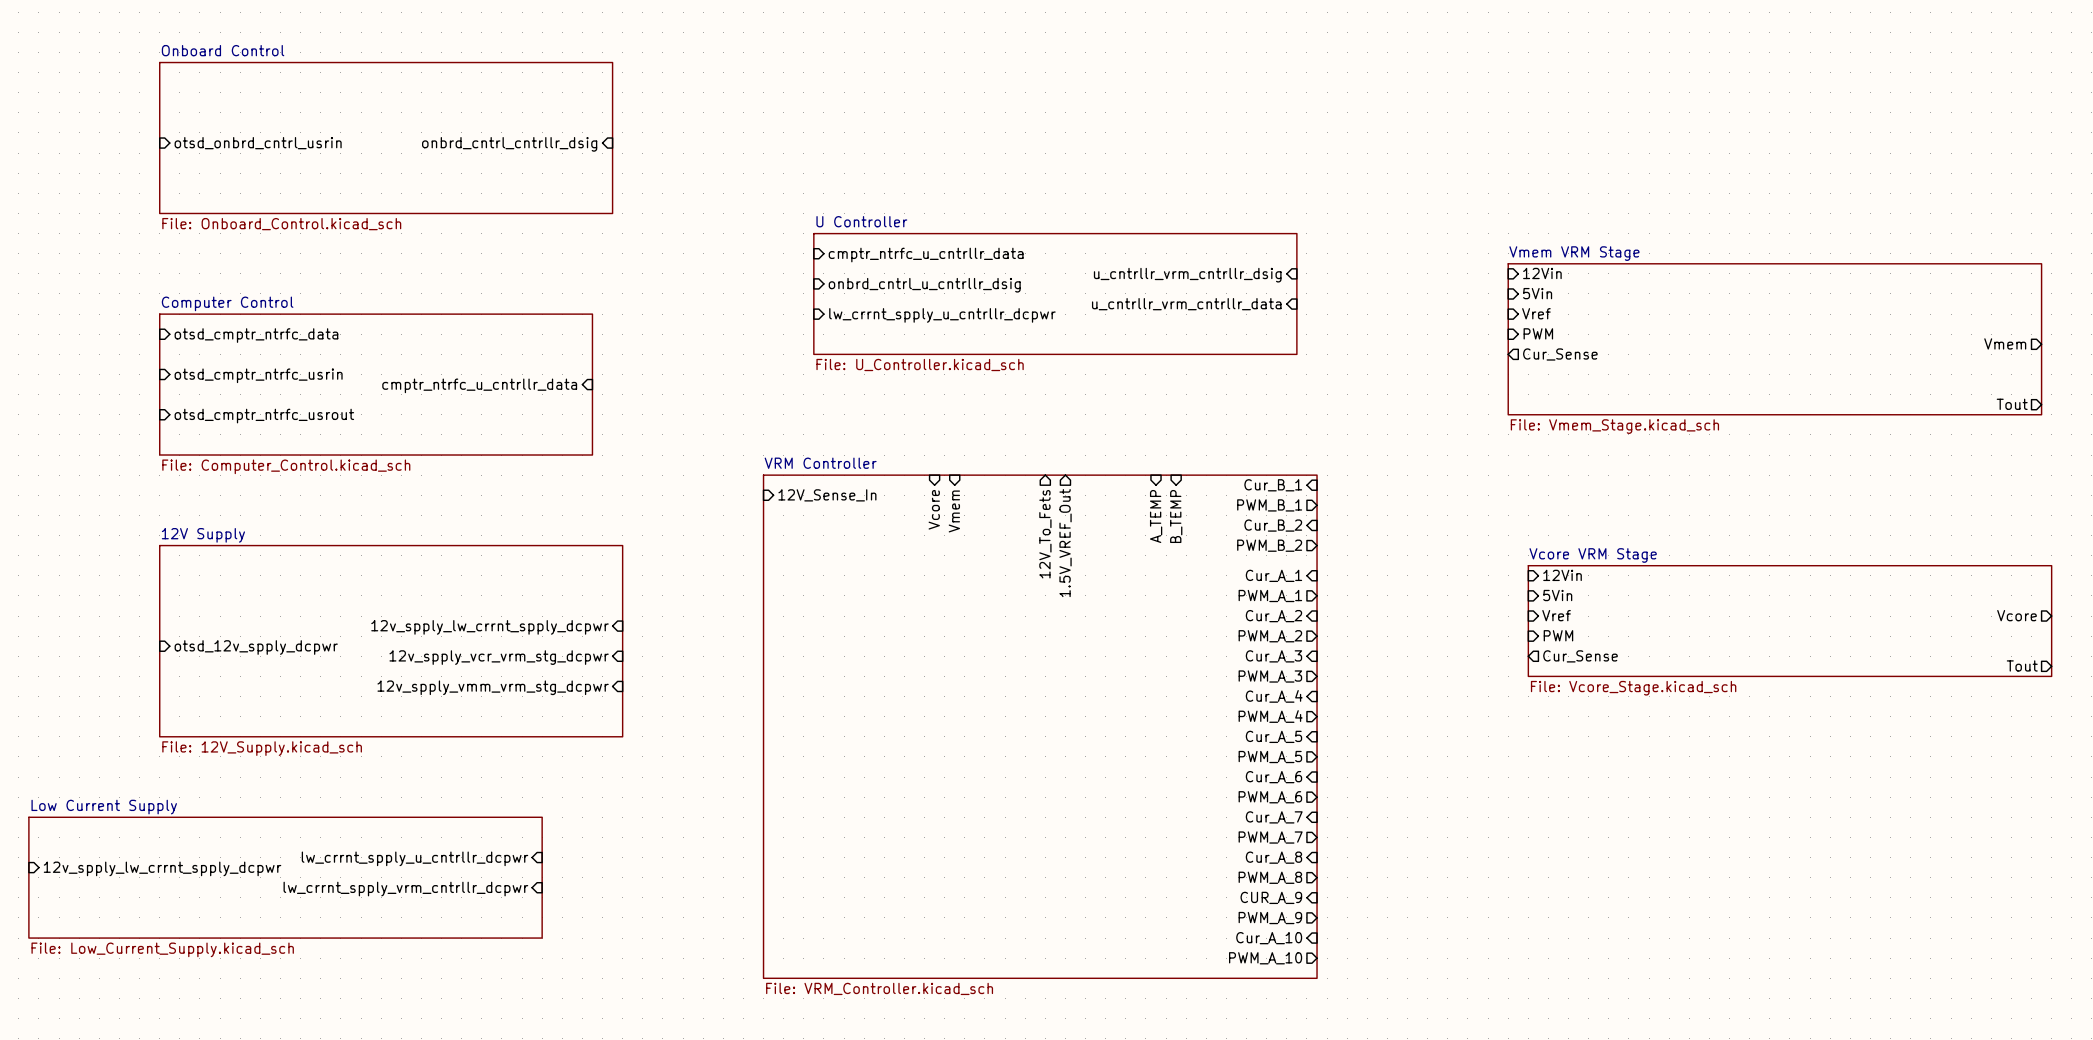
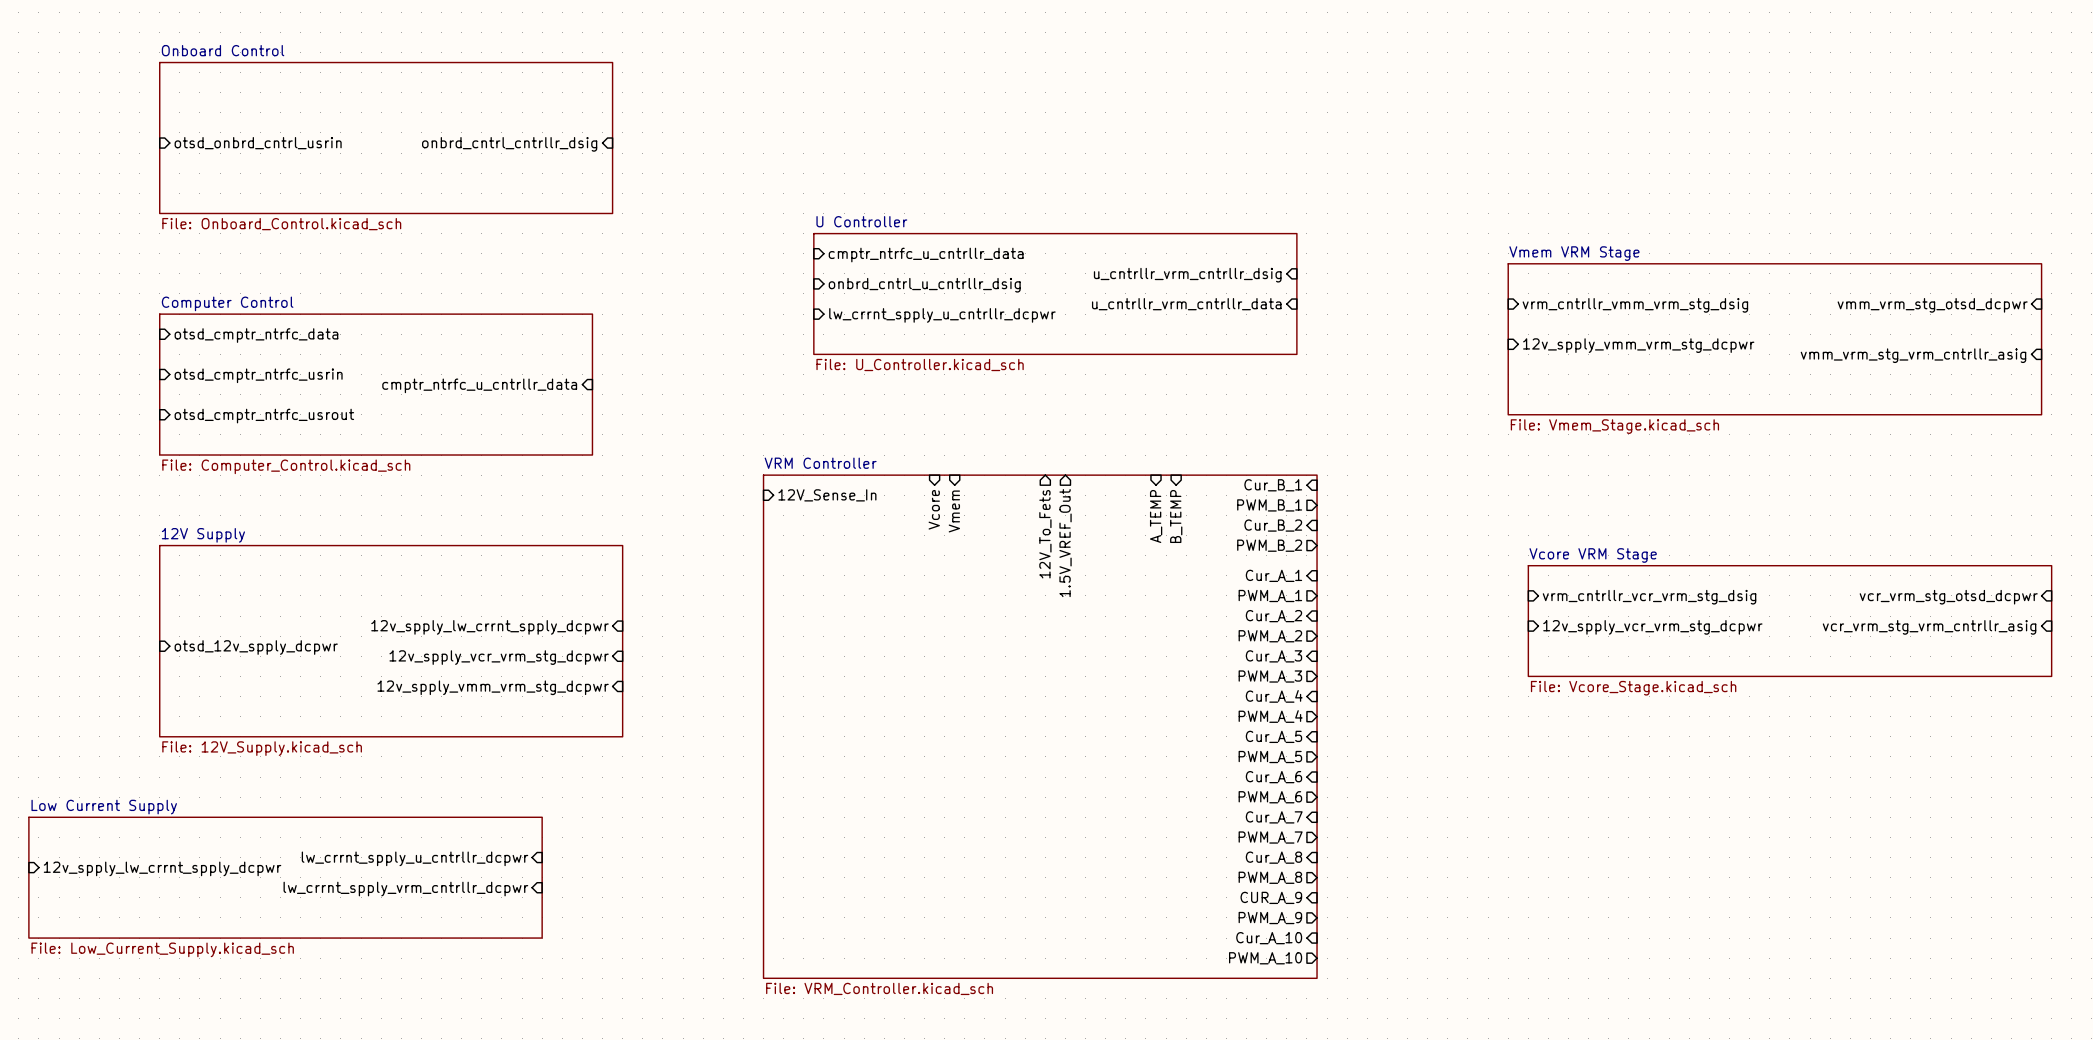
sheet pin: 12Vin (1542, 273) -> none
sheet pin: 5Vin (1537, 293) -> none
sheet pin: none -> vrm_cntrllr_vmm_vrm_stg_dsig (1635, 305)
sheet pin: none -> vmm_vrm_stg_otsd_dcpwr (1932, 305)
sheet pin: Vref (1536, 313) -> none
sheet pin: PWM (1538, 333) -> none
sheet pin: Vmem (2005, 343) -> none
sheet pin: none -> 12v_spply_vmm_vrm_stg_dcpwr (1638, 345)
sheet pin: Cur_Sense (1560, 354) -> none
sheet pin: none -> vmm_vrm_stg_vrm_cntrllr_asig (1913, 355)
sheet pin: Tout (2012, 404) -> none
sheet pin: 12Vin (1562, 575) -> none
sheet pin: 5Vin (1557, 595) -> vrm_cntrllr_vcr_vrm_stg_dsig (1649, 597)
sheet pin: none -> vcr_vrm_stg_otsd_dcpwr (1948, 597)
sheet pin: Vref (1556, 615) -> none
sheet pin: Vcore (2016, 615) -> none
sheet pin: none -> 12v_spply_vcr_vrm_stg_dcpwr (1652, 627)
sheet pin: none -> vcr_vrm_stg_vrm_cntrllr_asig (1929, 627)
sheet pin: PWM (1558, 635) -> none
sheet pin: Cur_Sense (1580, 656) -> none
sheet pin: Tout (2022, 665) -> none

